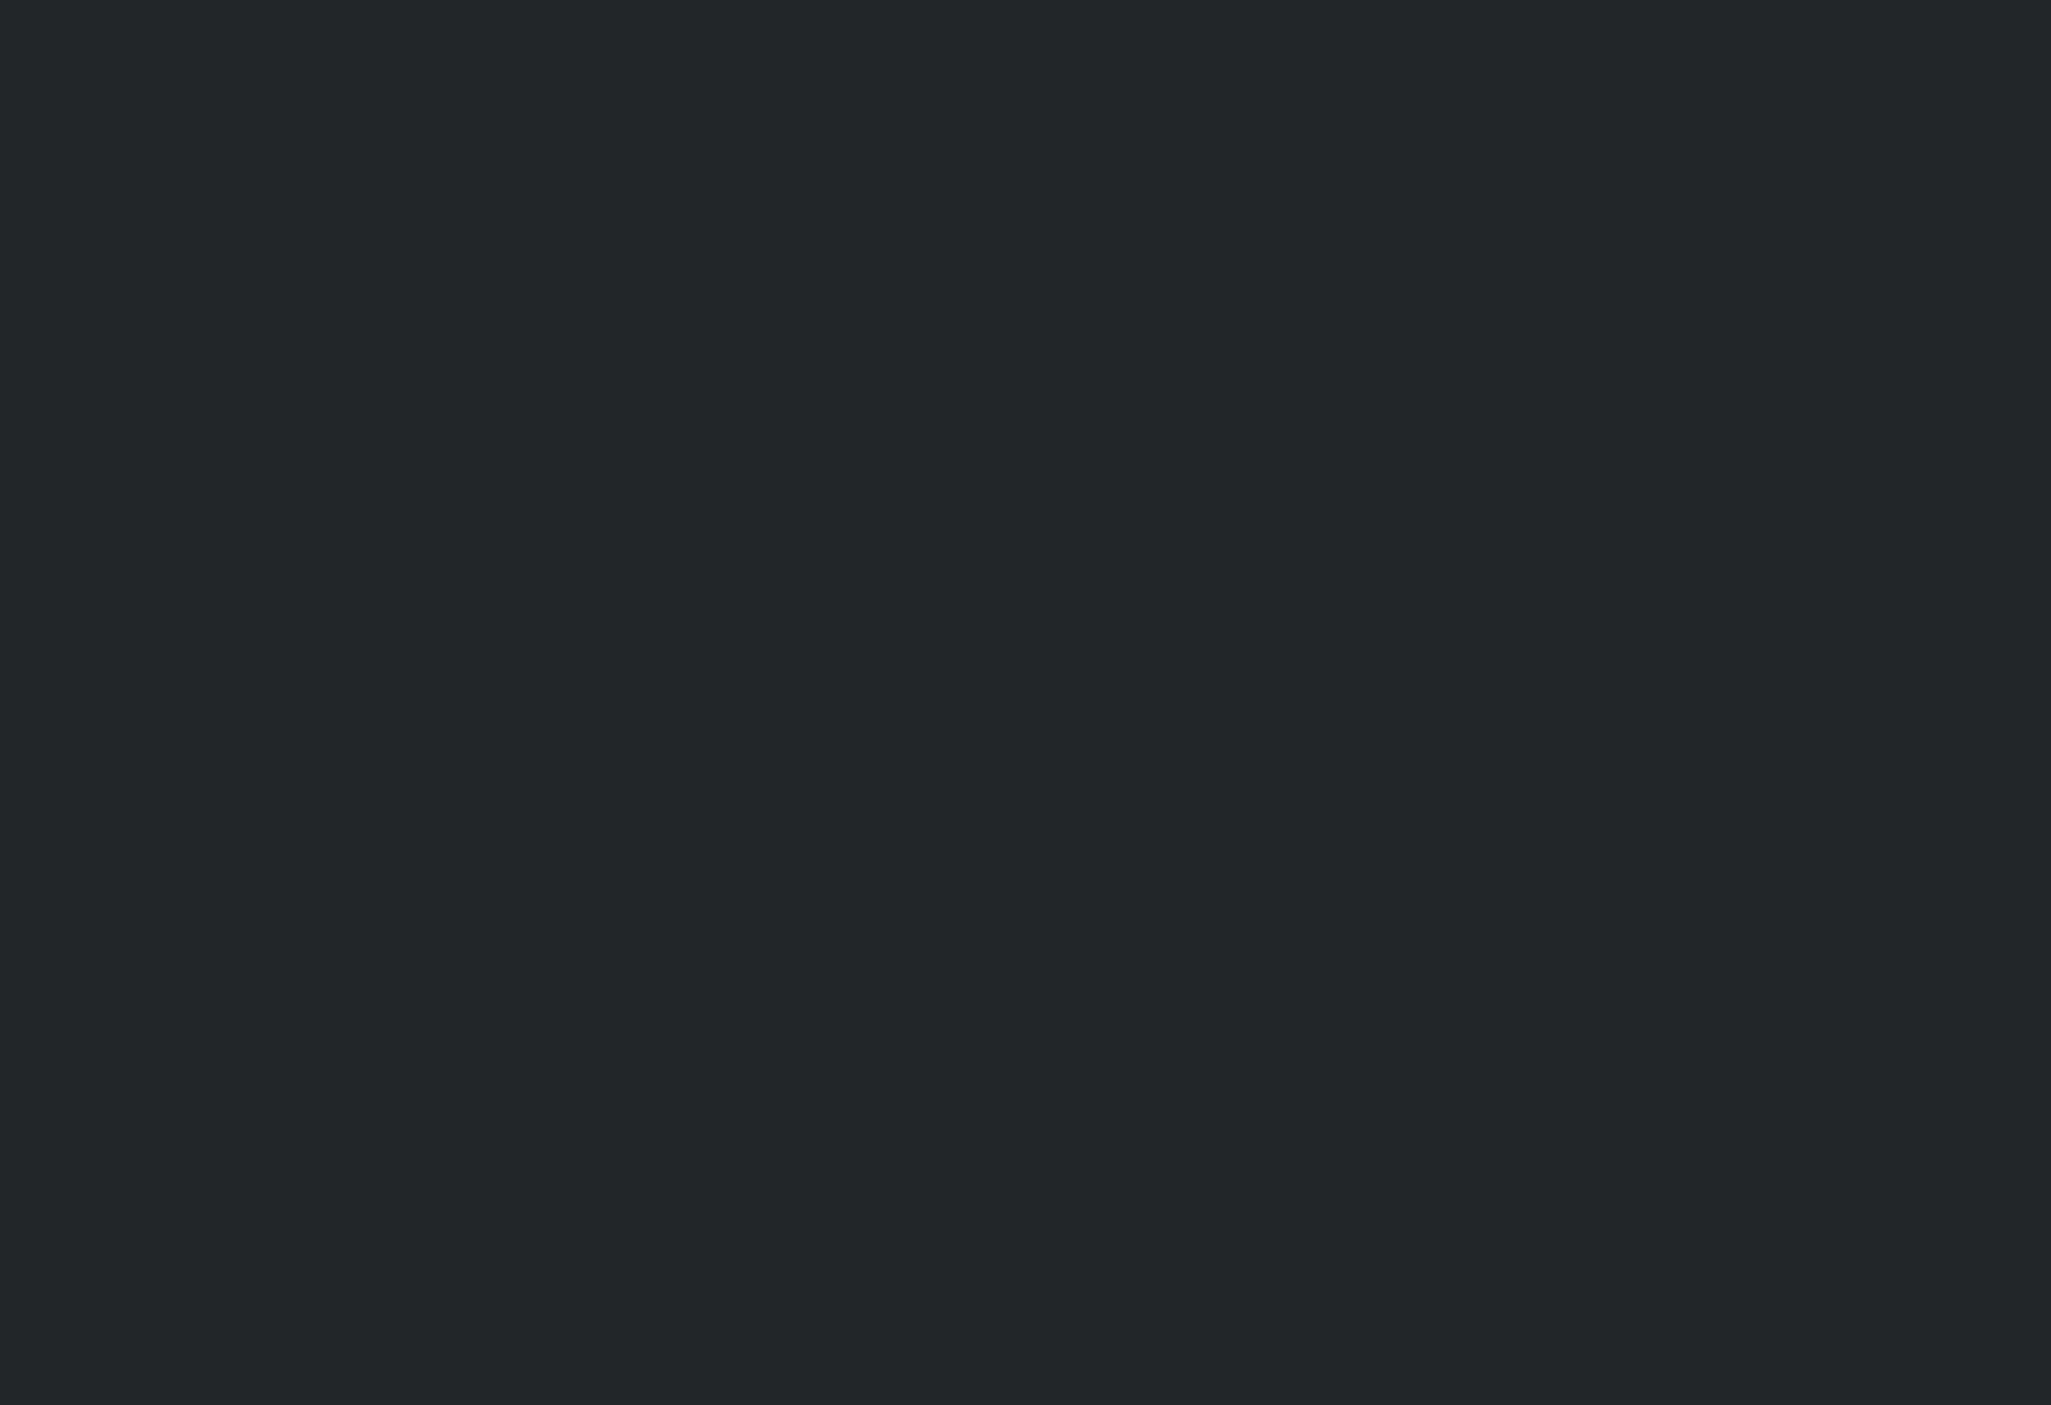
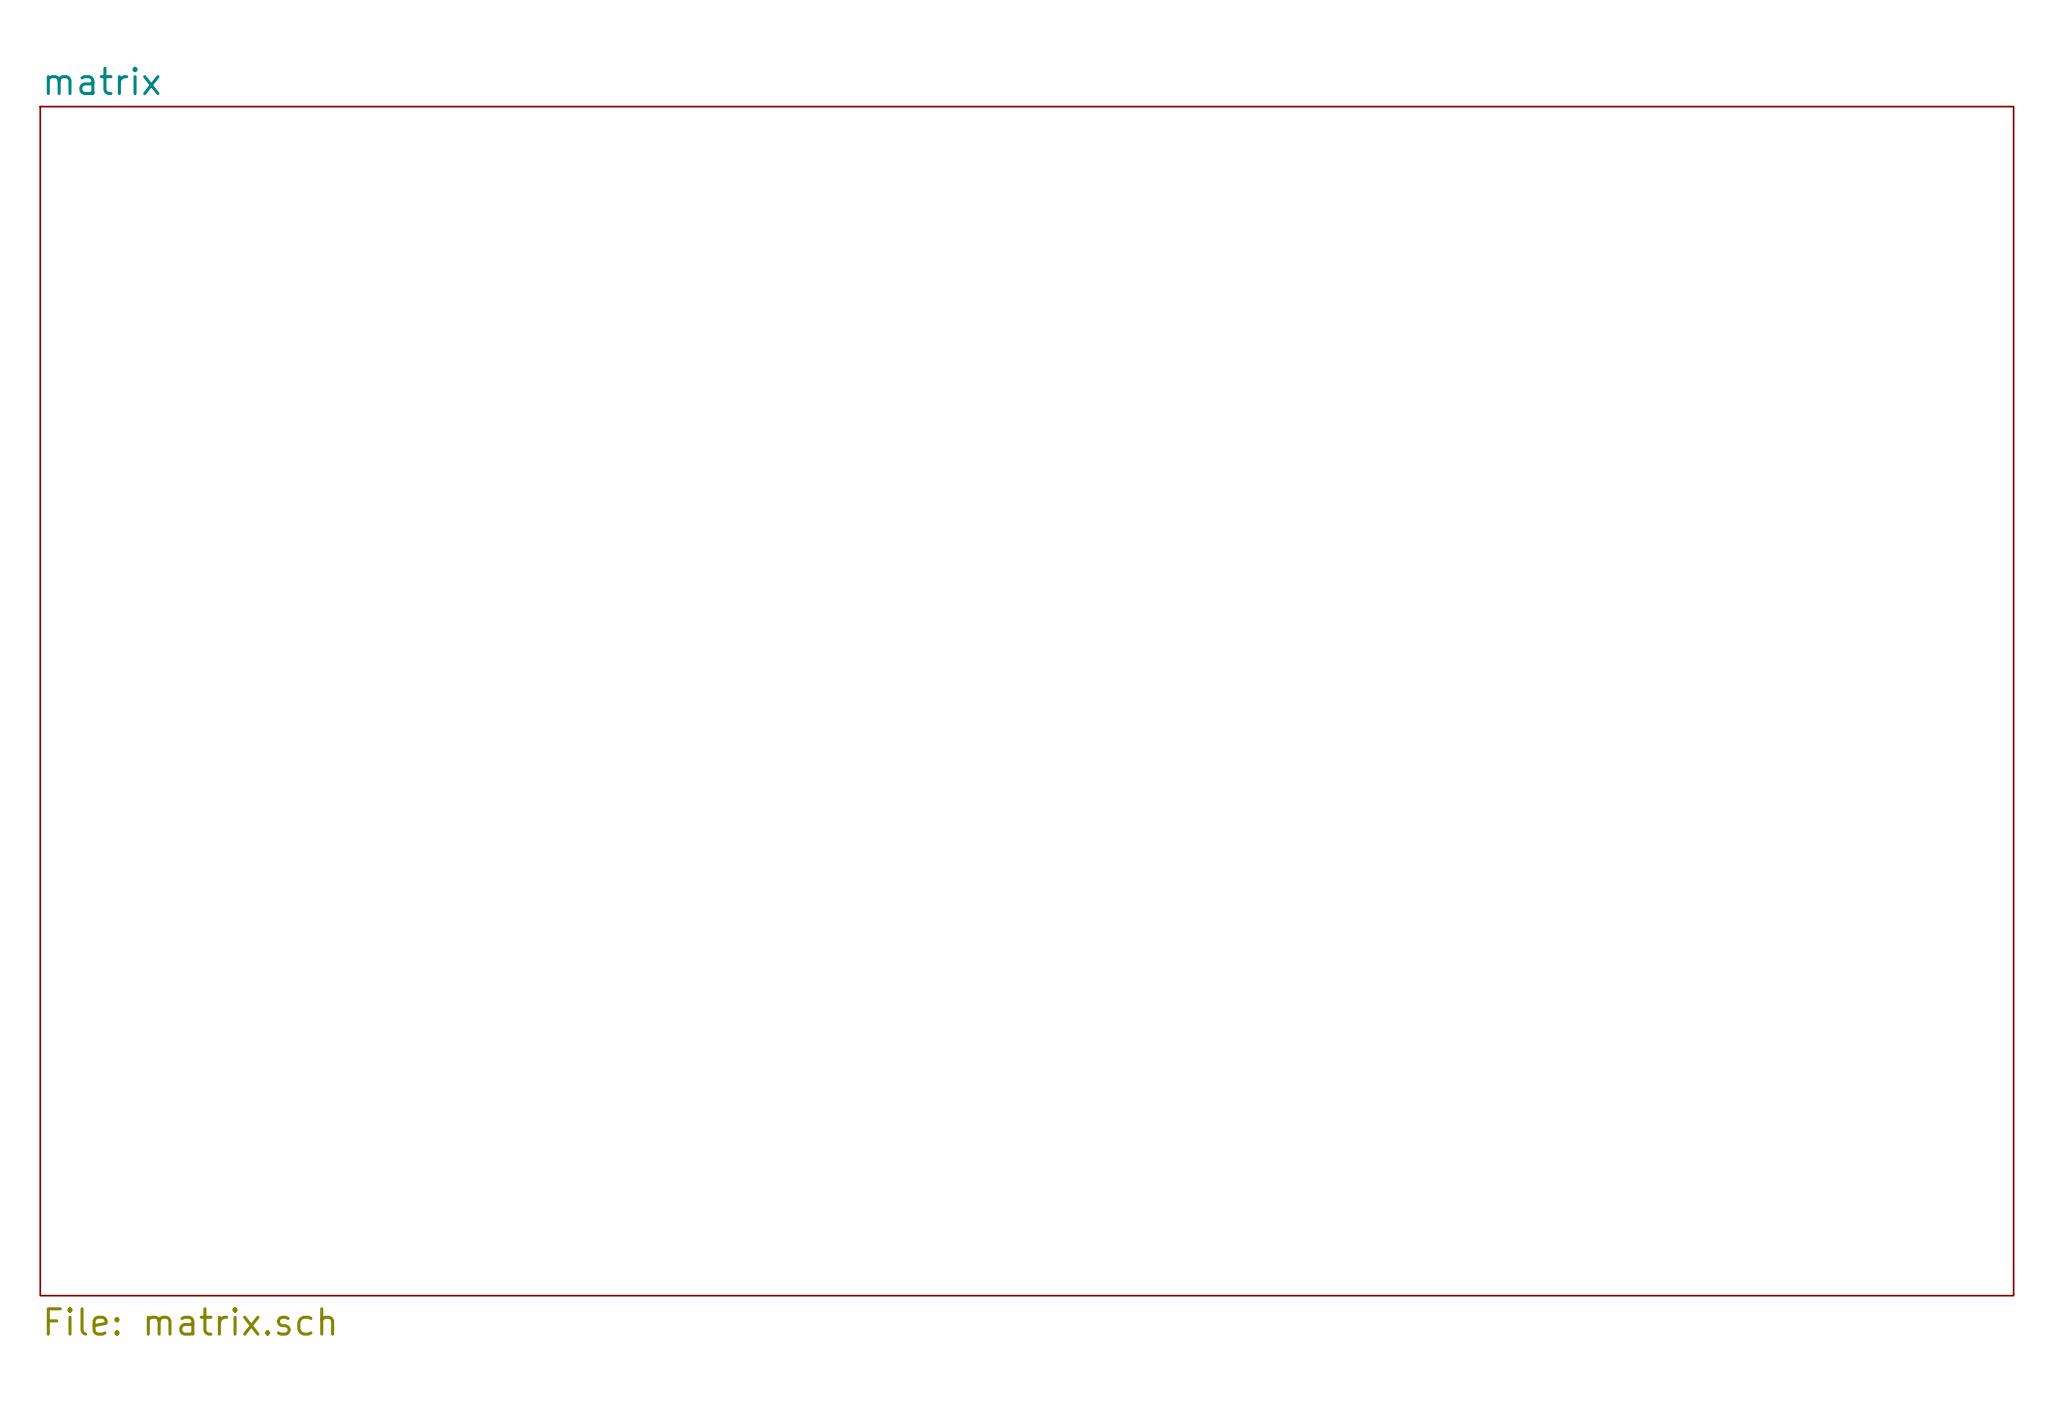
sheet matrix: none -> File: matrix.sch (1026, 701)

